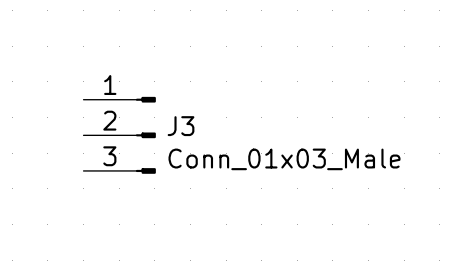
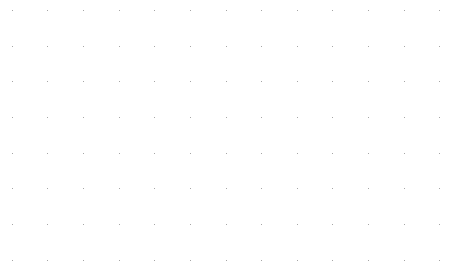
J3: Conn_01x03_Male (119, 135) -> none

